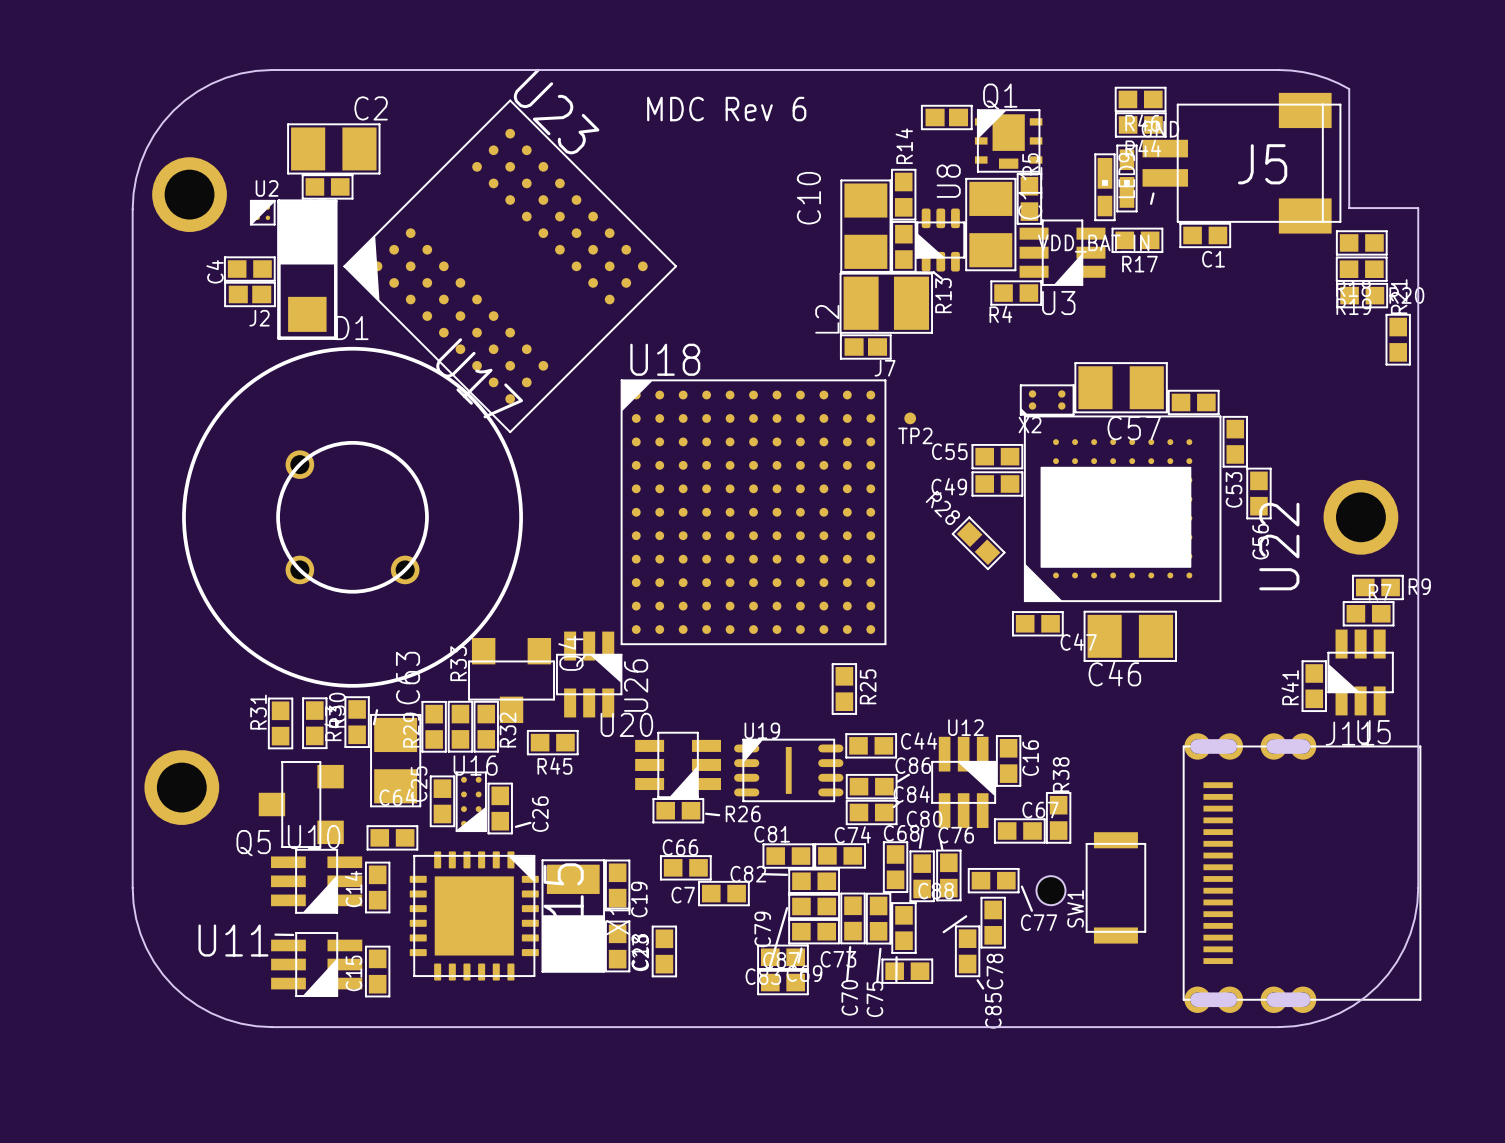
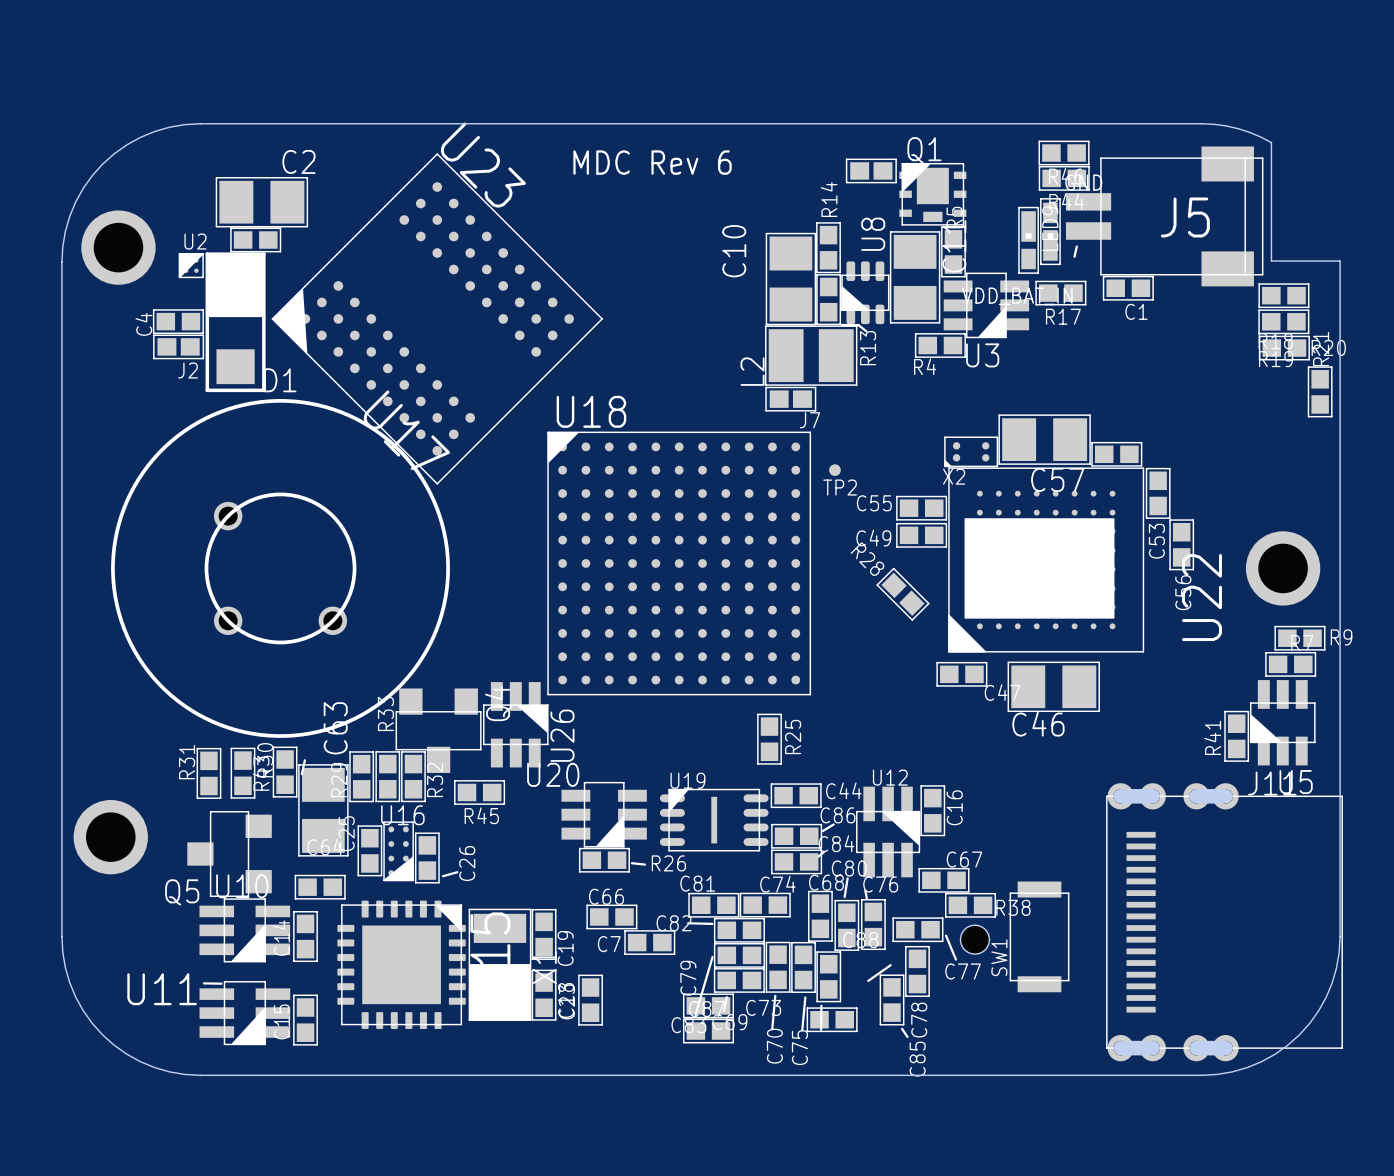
R38 rotation: 0° (1058, 817) -> 90° clockwise (970, 905)
R38 position: (1058, 817) -> (970, 905)

